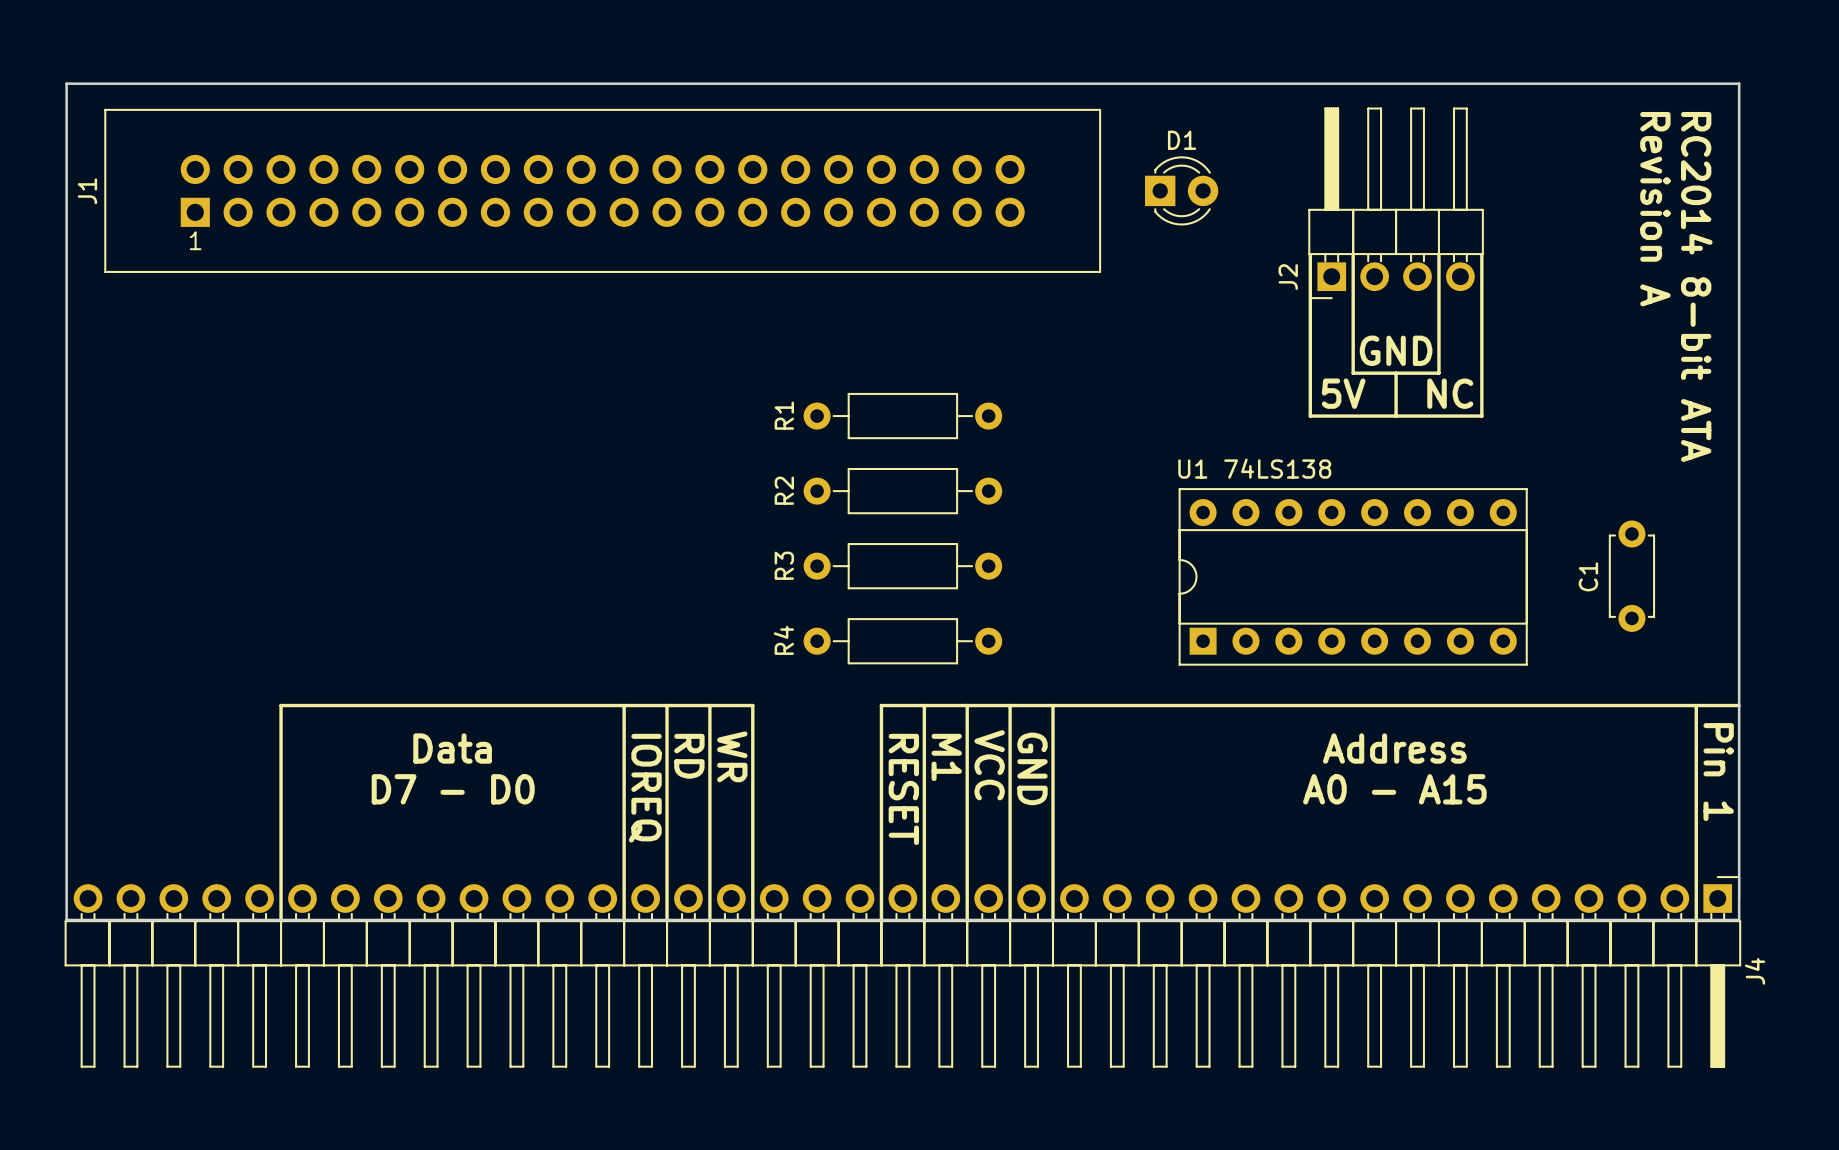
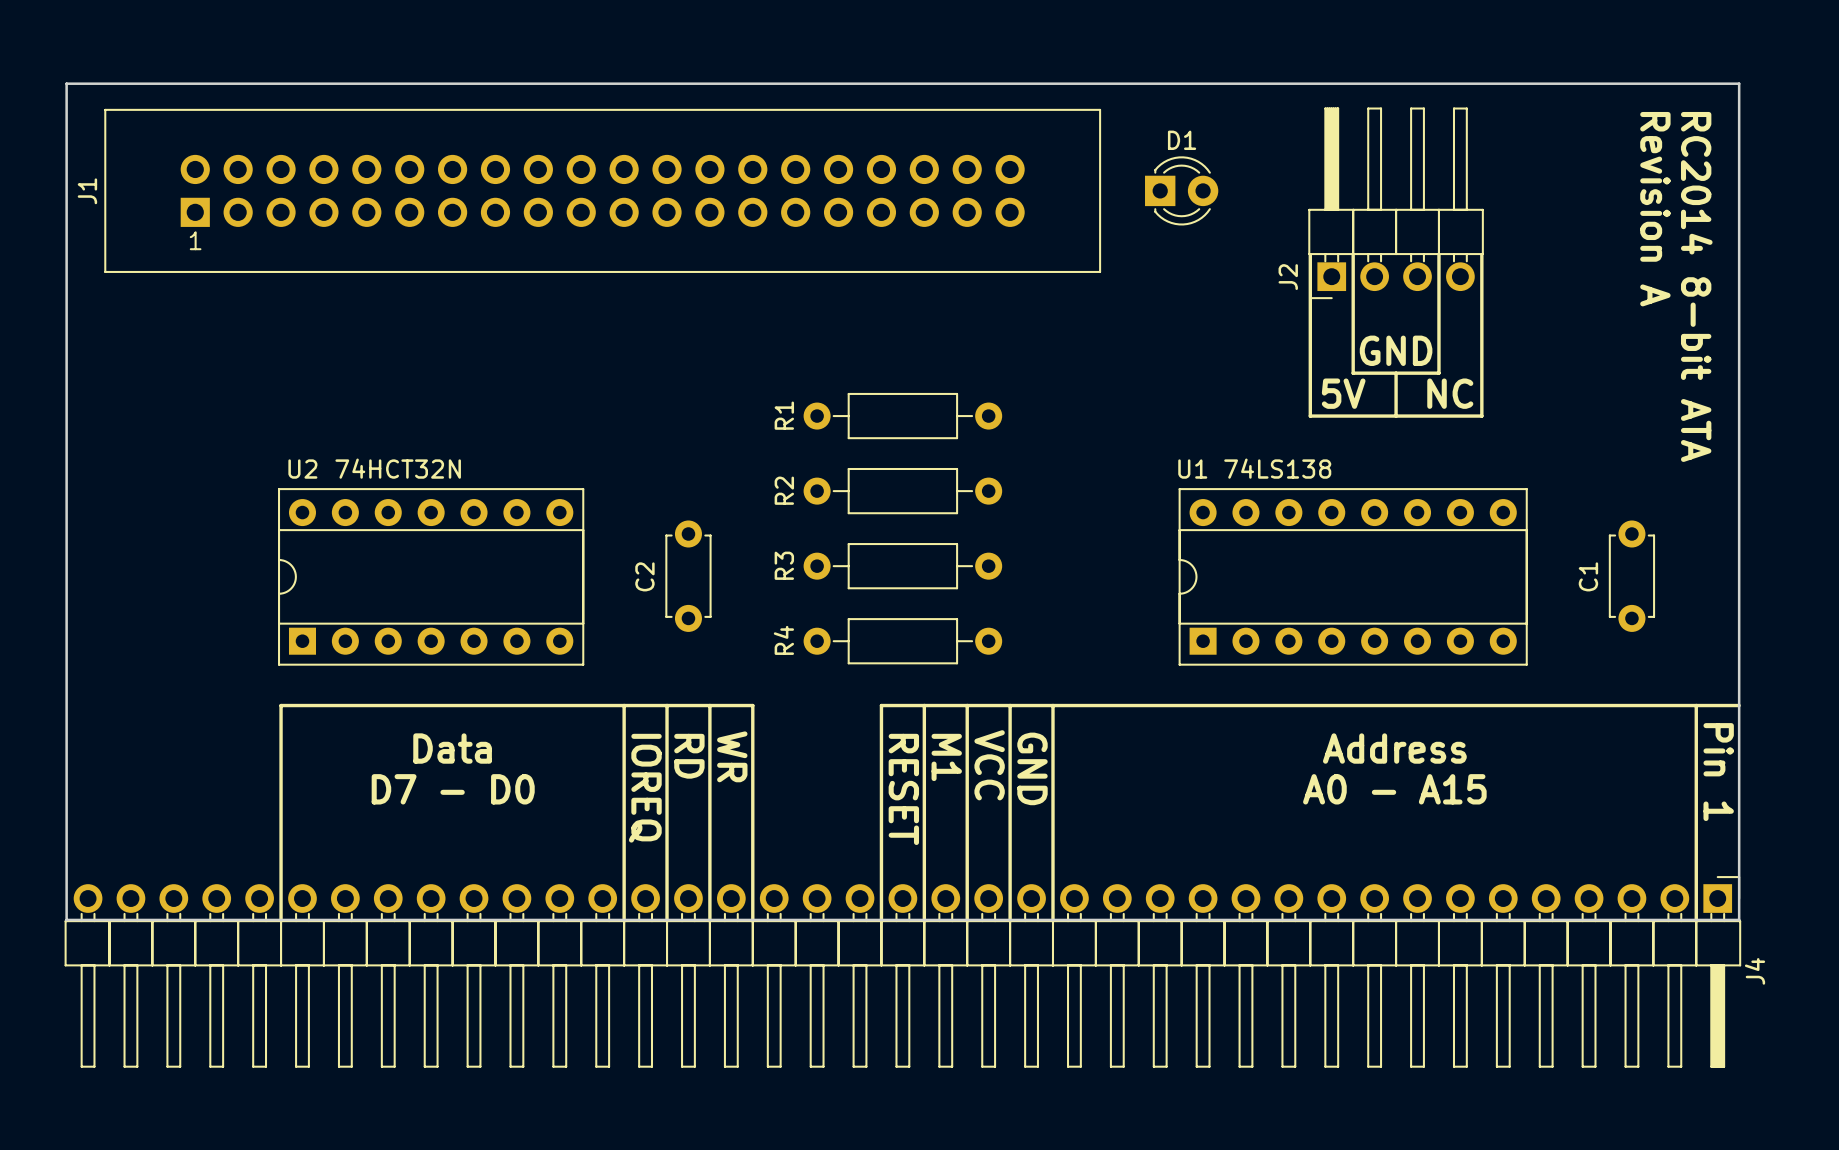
U2: none -> 74HCT32N (431, 576)
C2: none -> (688, 576)

